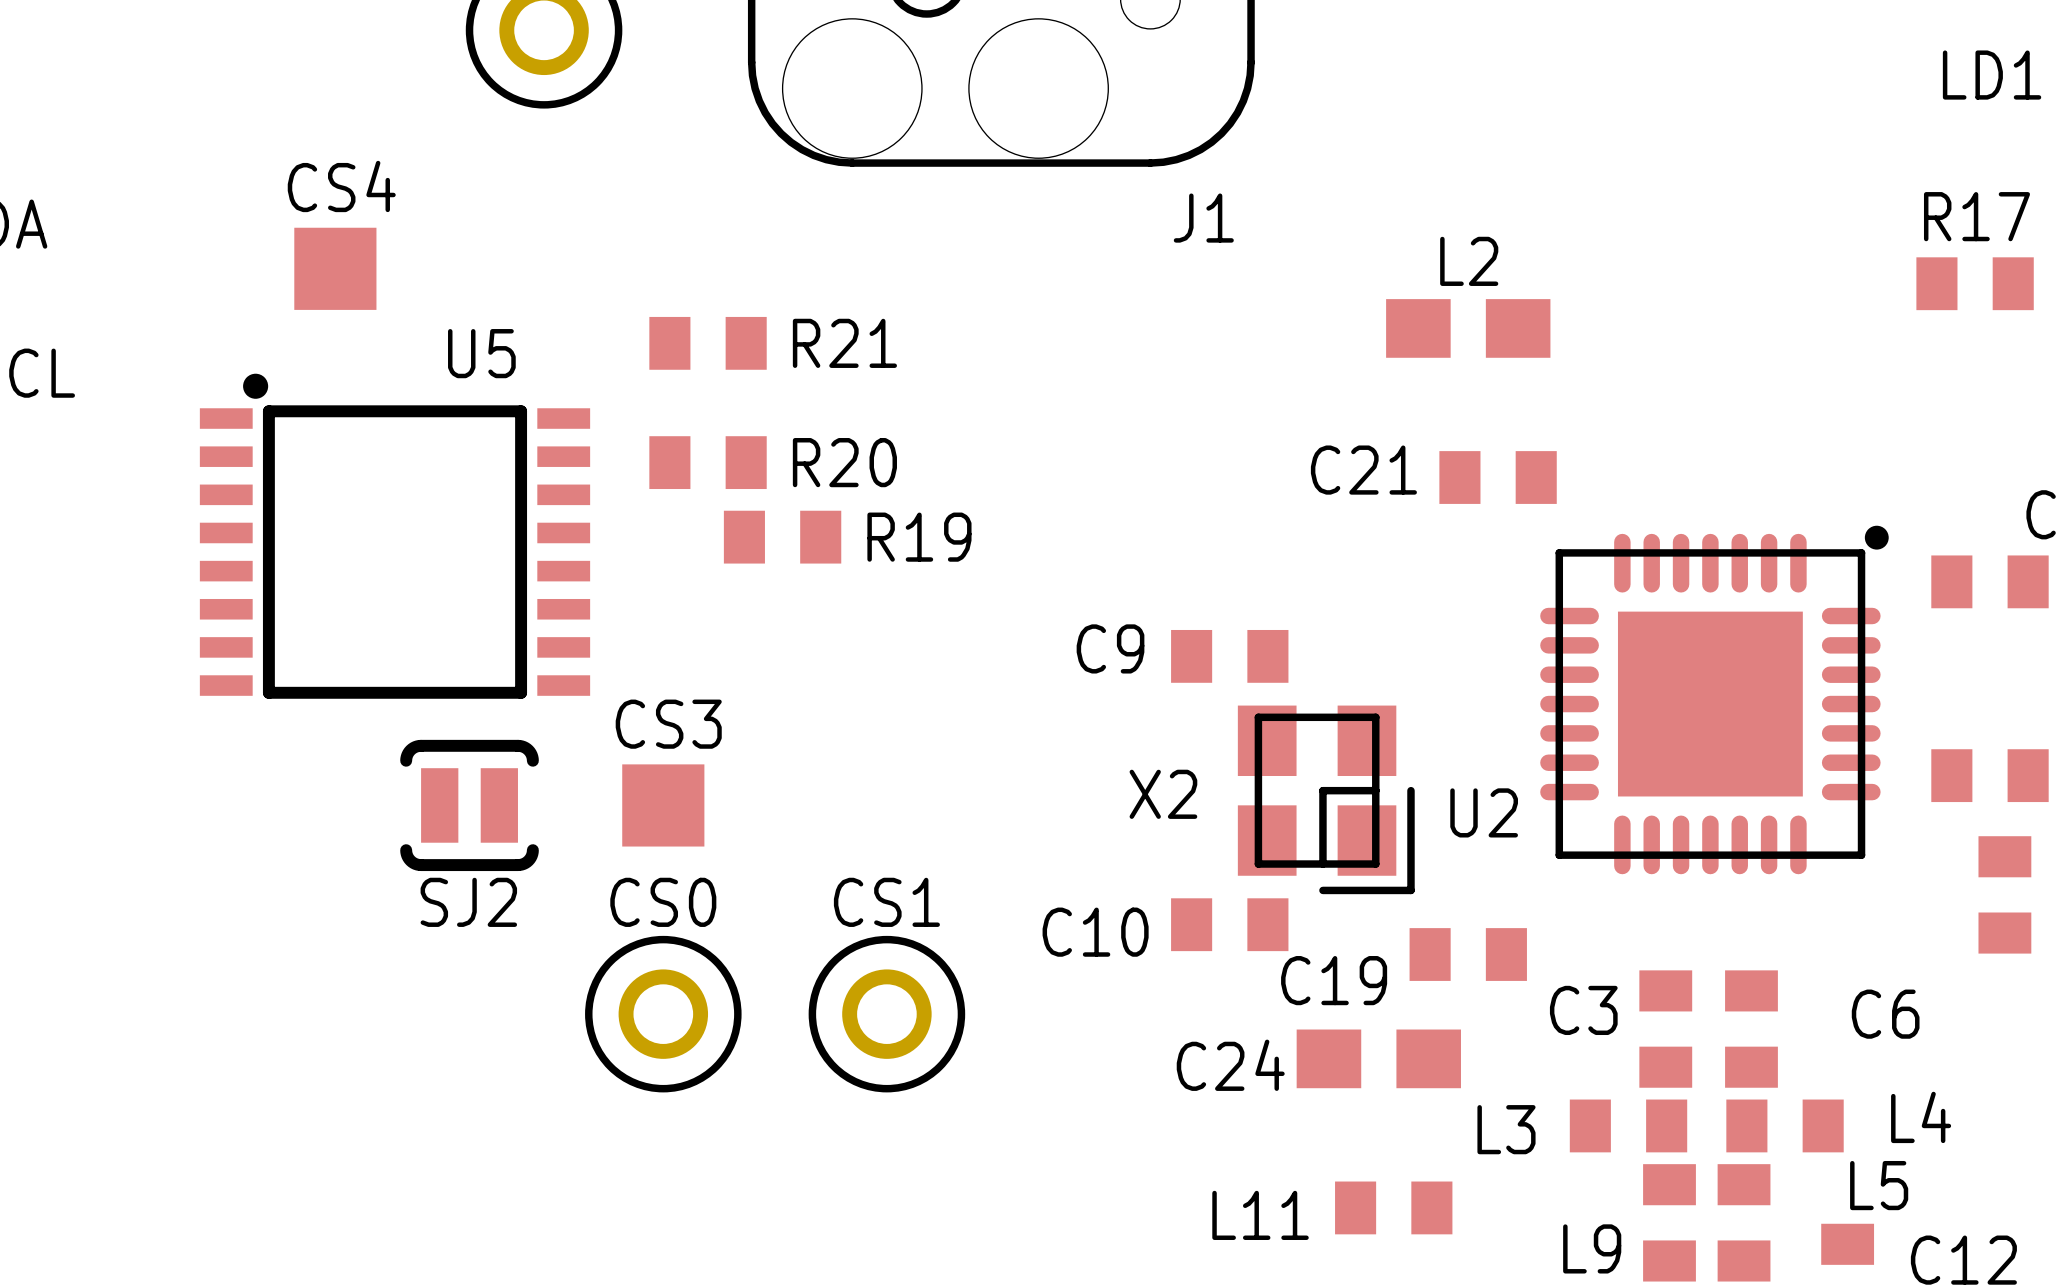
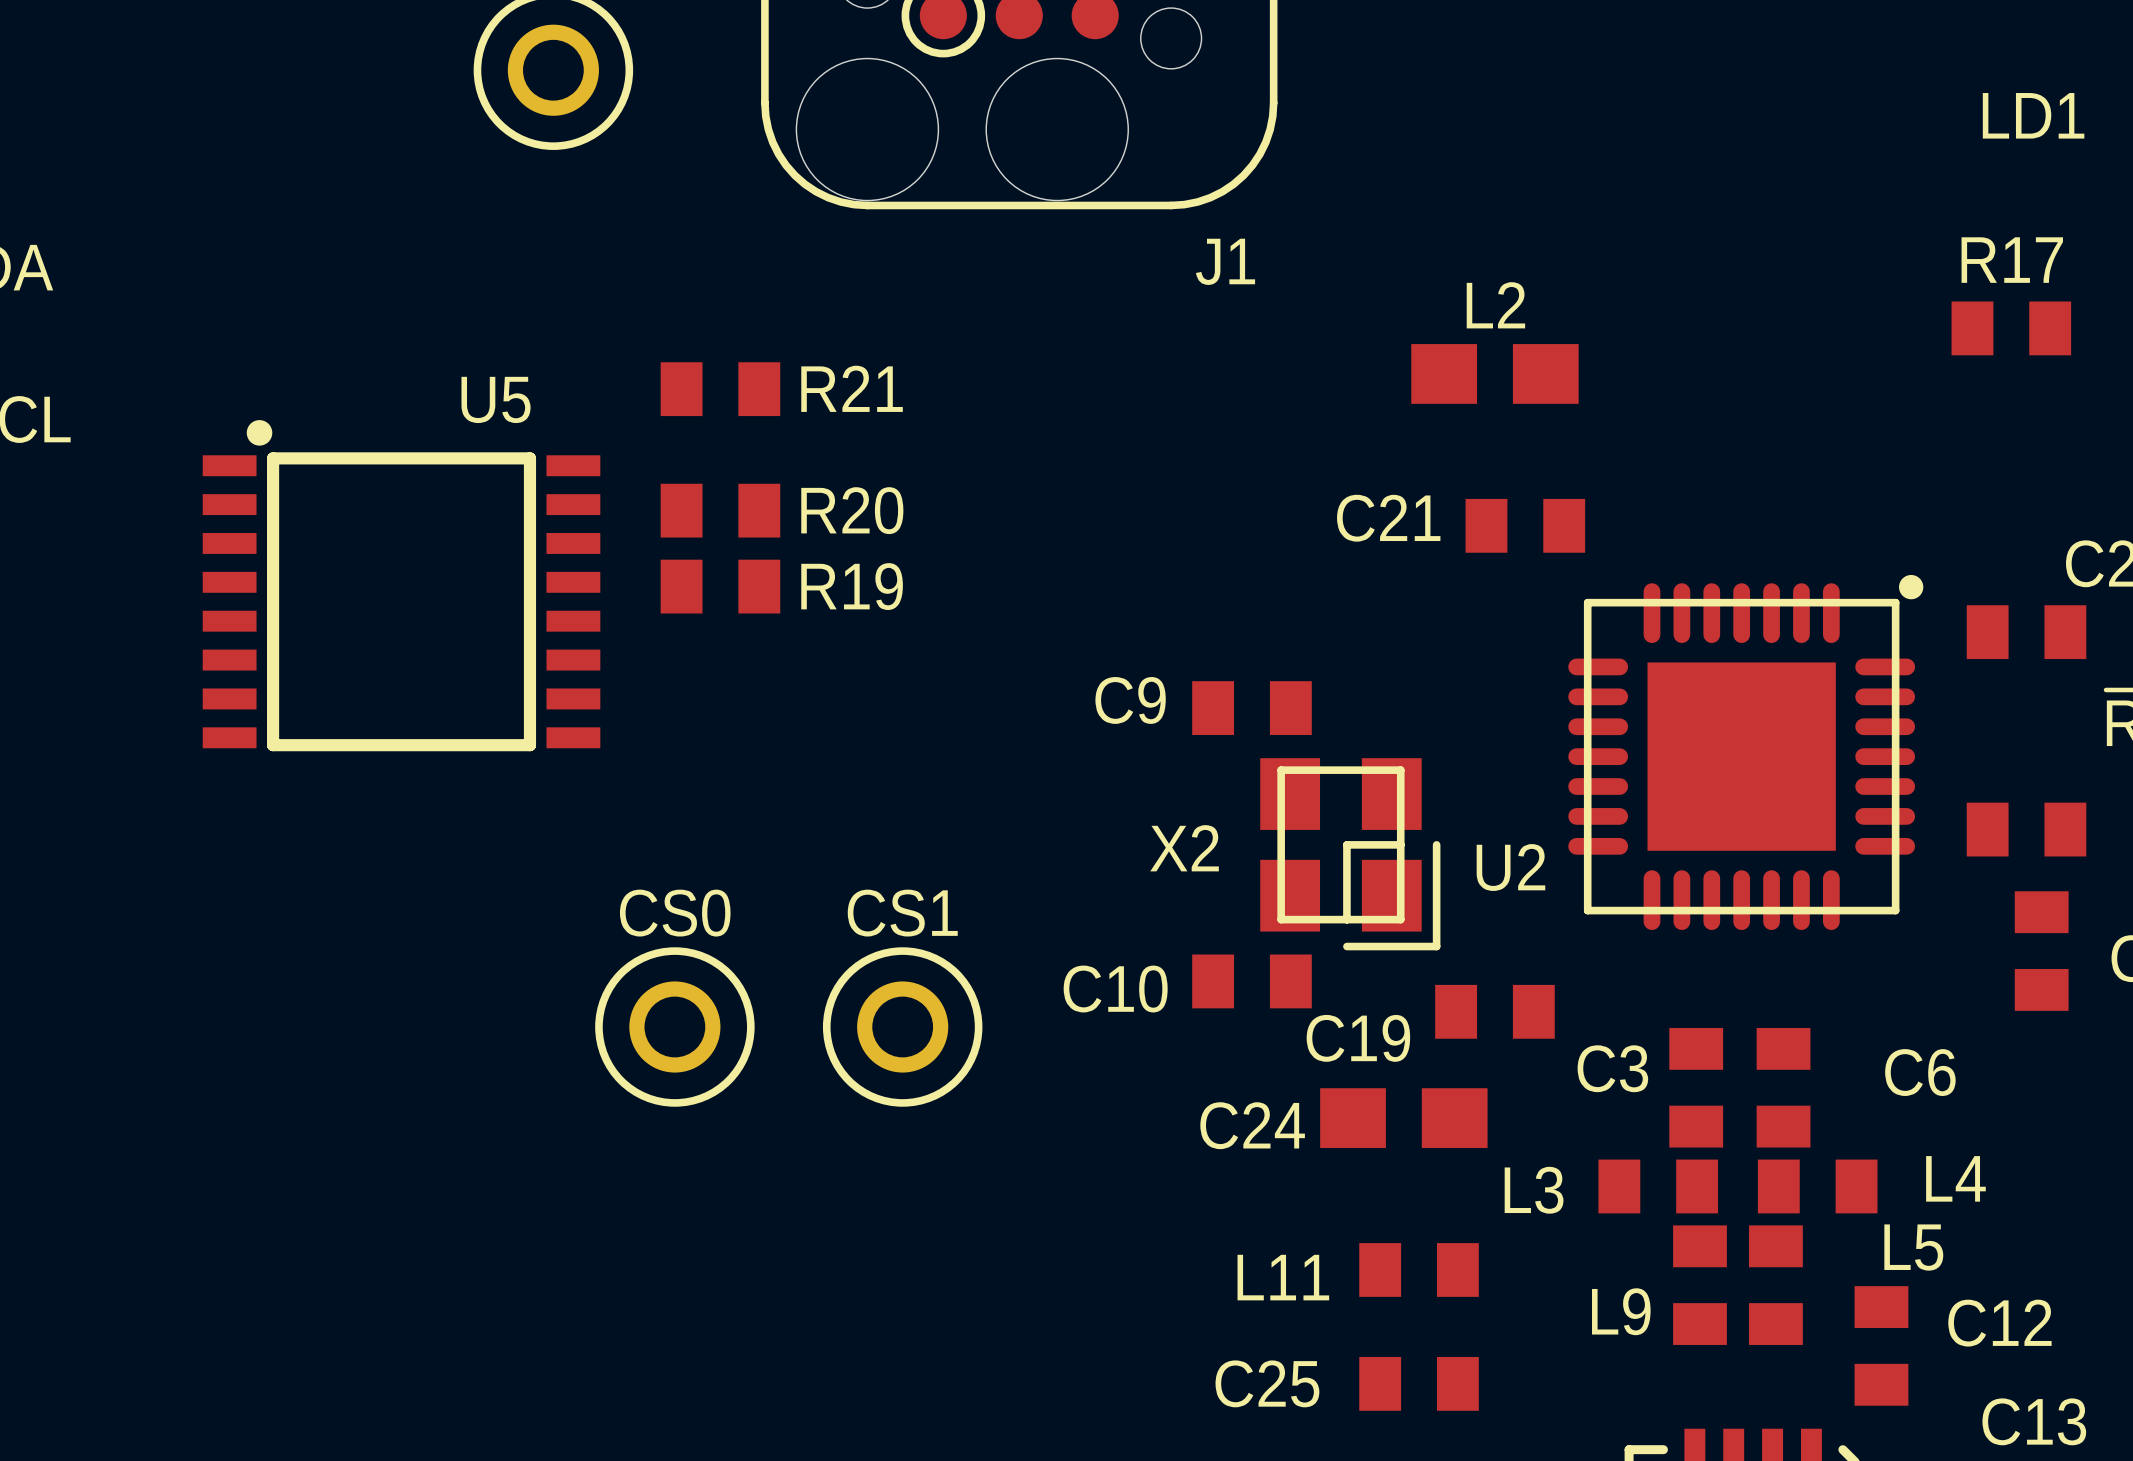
CS4: (335, 268) -> none
R19 position: (782, 537) -> (720, 586)
SJ2: (469, 805) -> none
CS3: (663, 805) -> none
CS0 position: (663, 1014) -> (674, 1027)
CS1 position: (886, 1014) -> (902, 1027)

